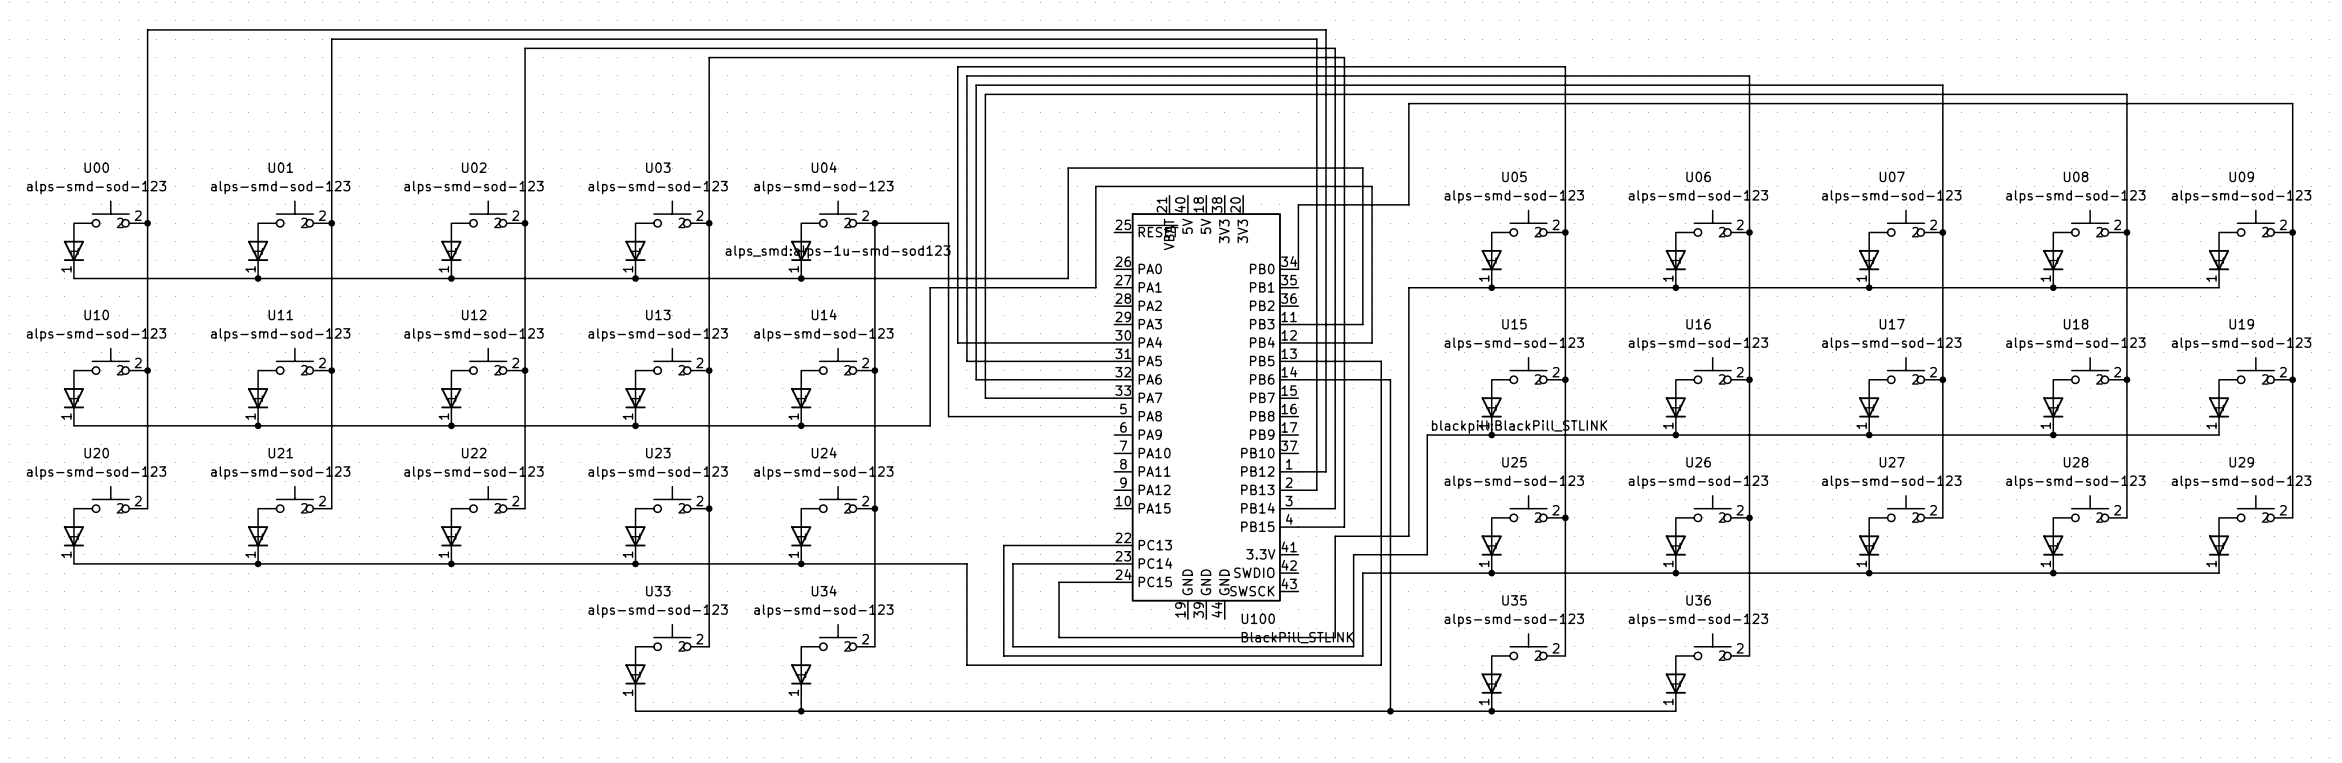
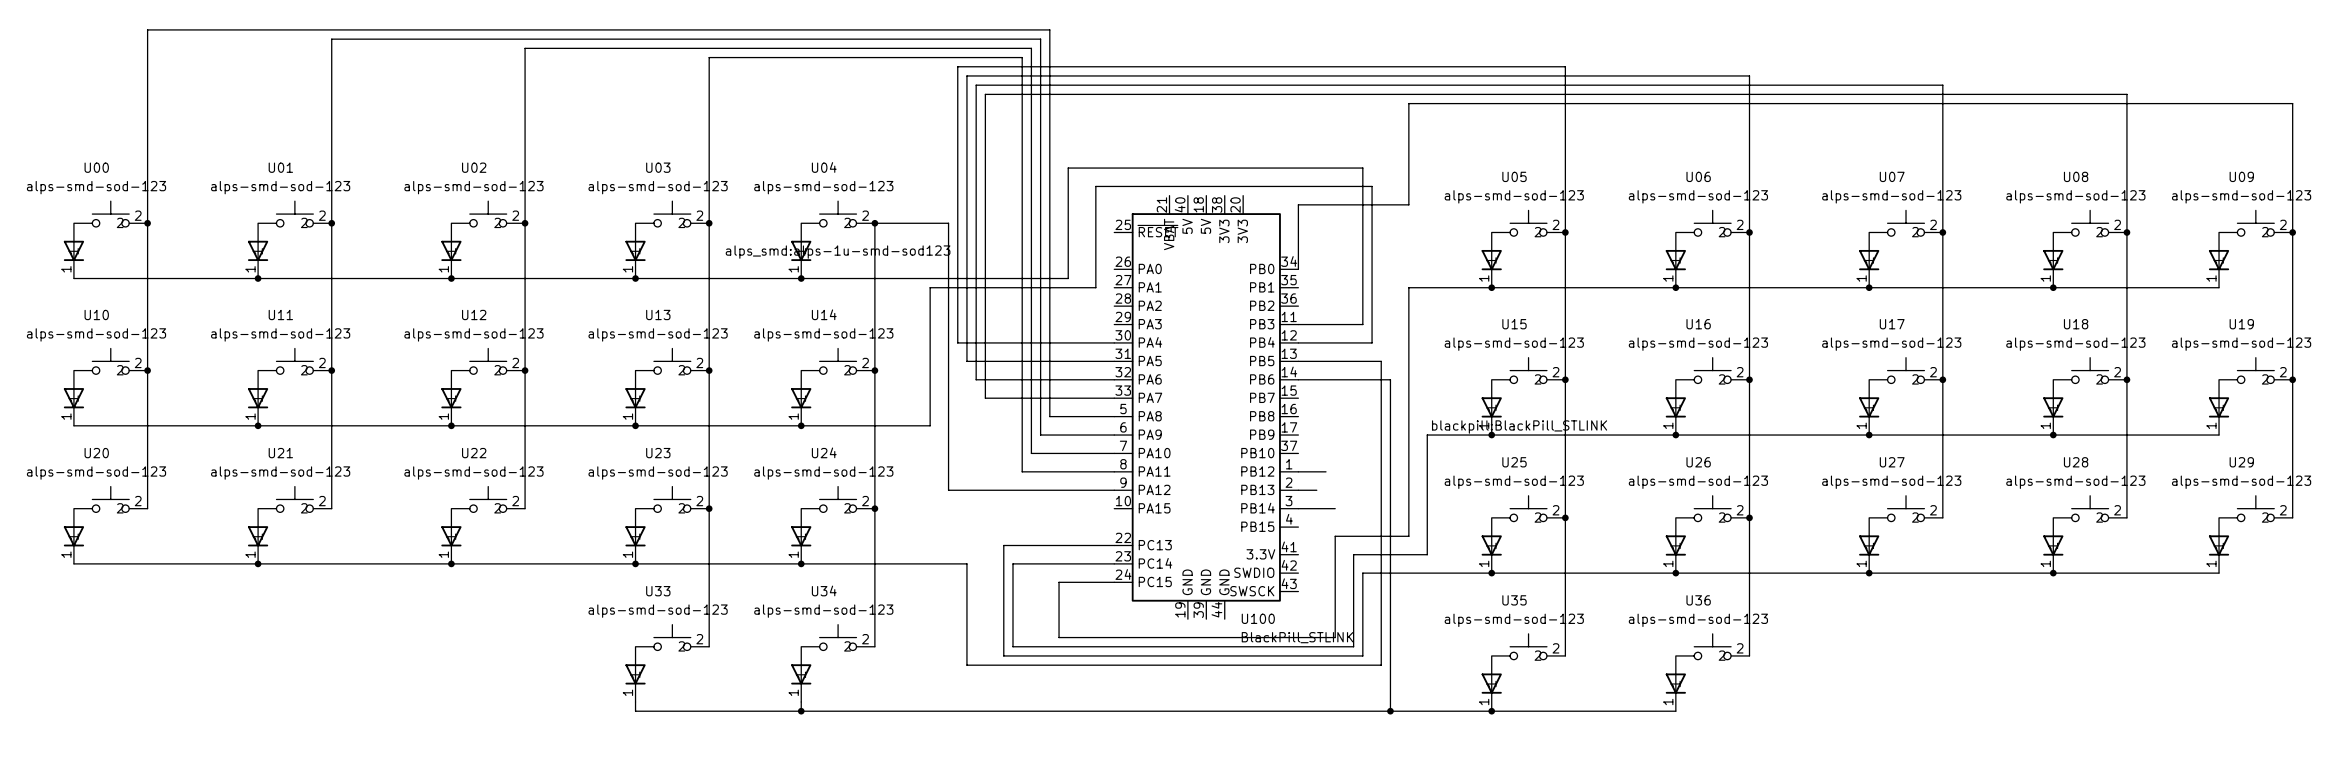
wire: (1049, 29) (1326, 29) (1326, 471) -> (1049, 29) (1049, 416)
wire: (1040, 39) (1316, 39) (1316, 490) -> (1040, 39) (1040, 435) (1114, 435)
wire: (1031, 48) (1335, 48) (1335, 508) -> (1031, 48) (1031, 453) (1114, 453)
wire: (1022, 57) (1344, 57) (1344, 527) (1298, 527) -> (1022, 57) (1022, 471) (1114, 471)
wire: (948, 416) (1049, 416) -> (948, 416) (948, 490) (1114, 490)

